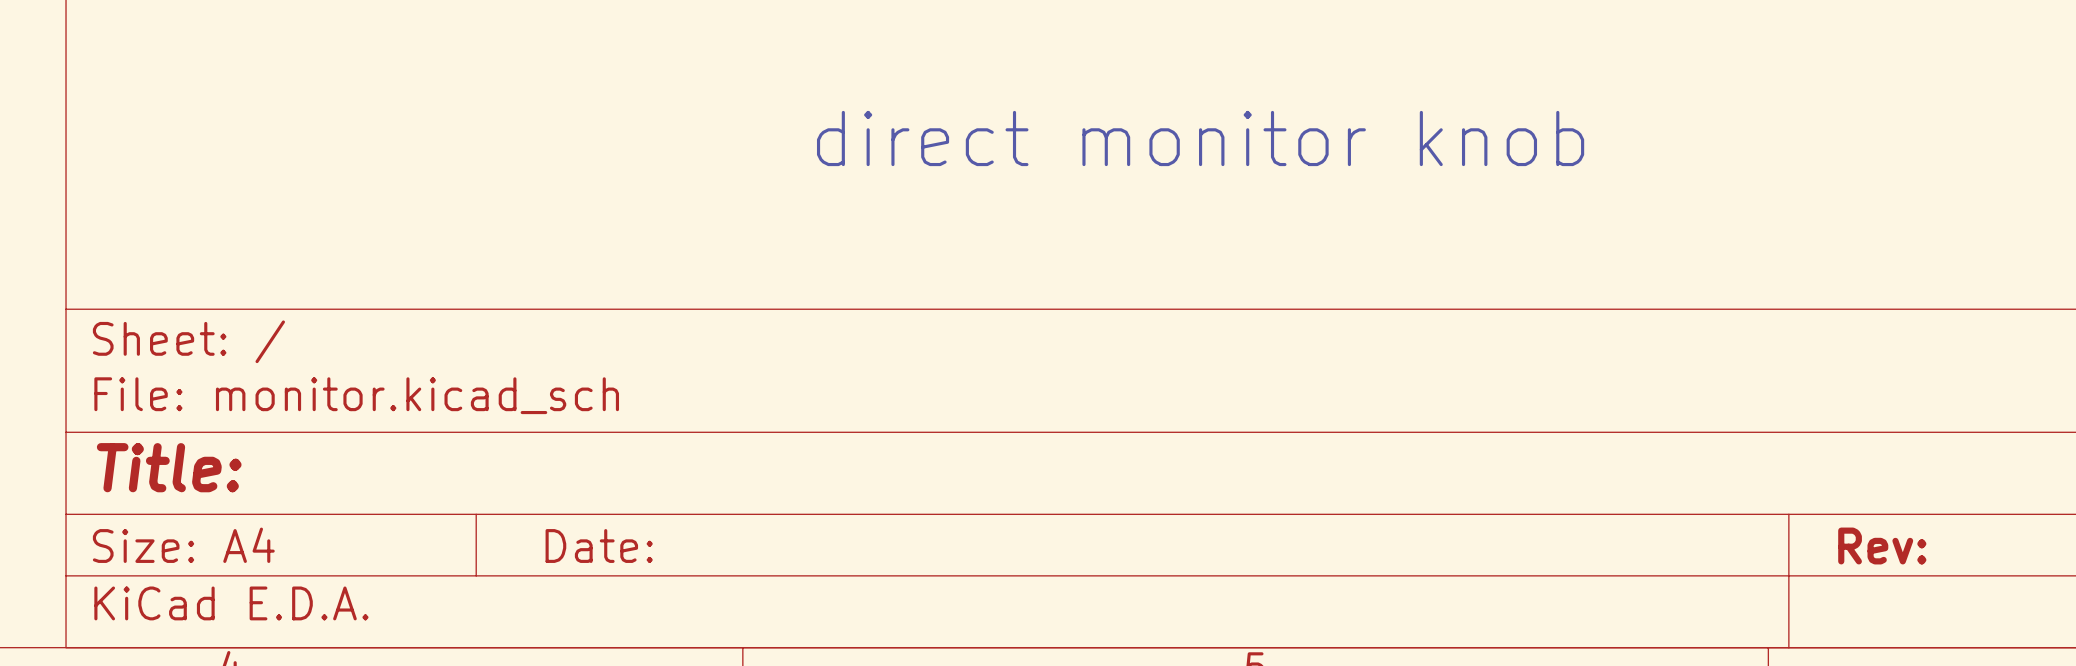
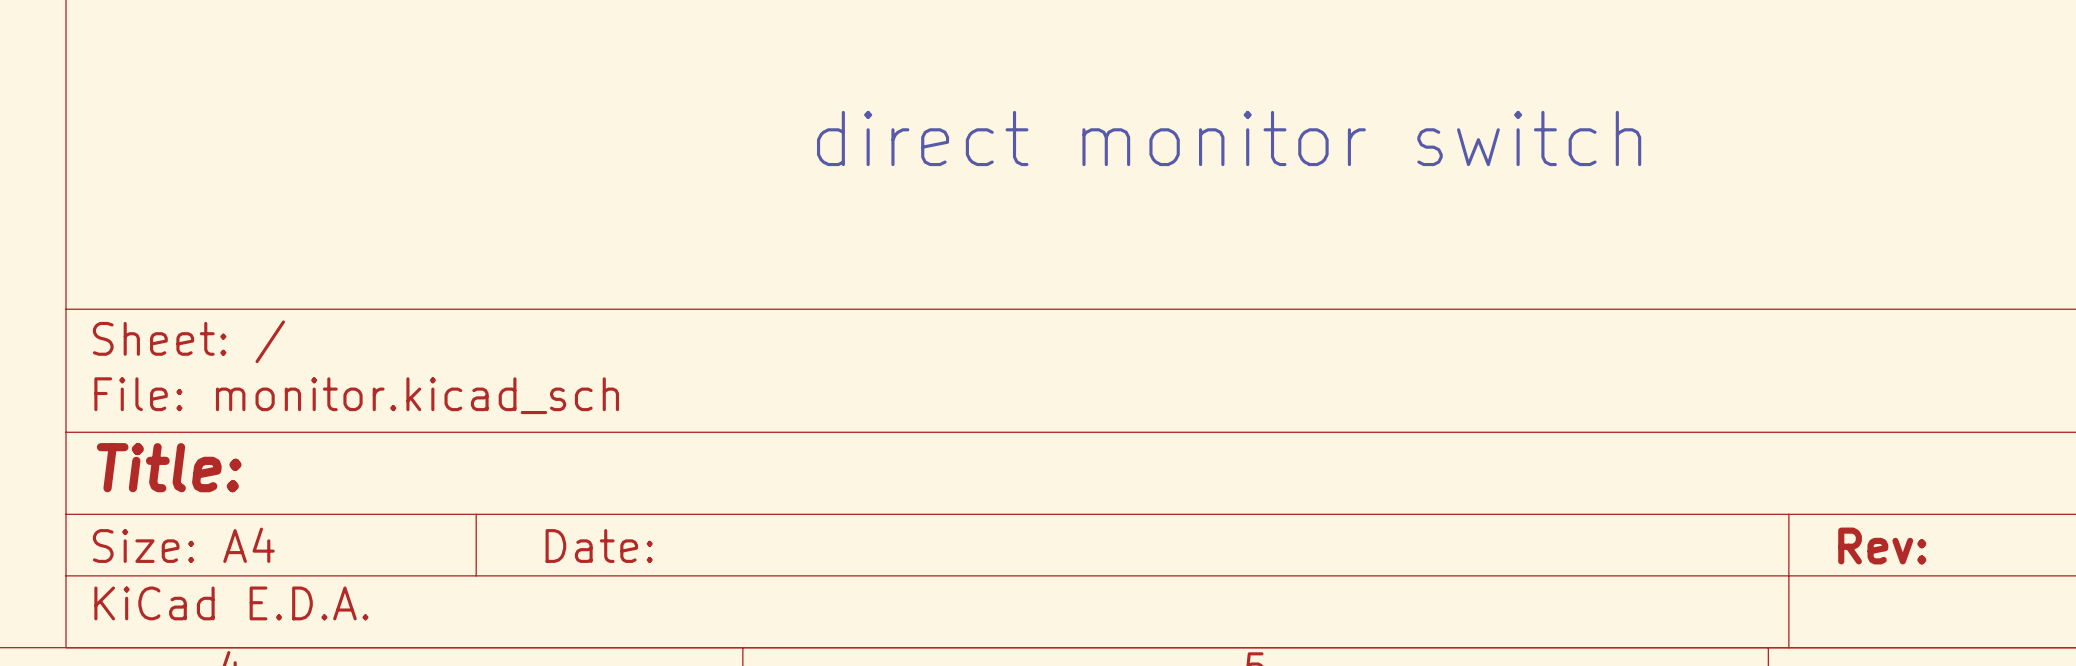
text: direct monitor knob (1200, 138) -> direct monitor switch (1229, 138)

